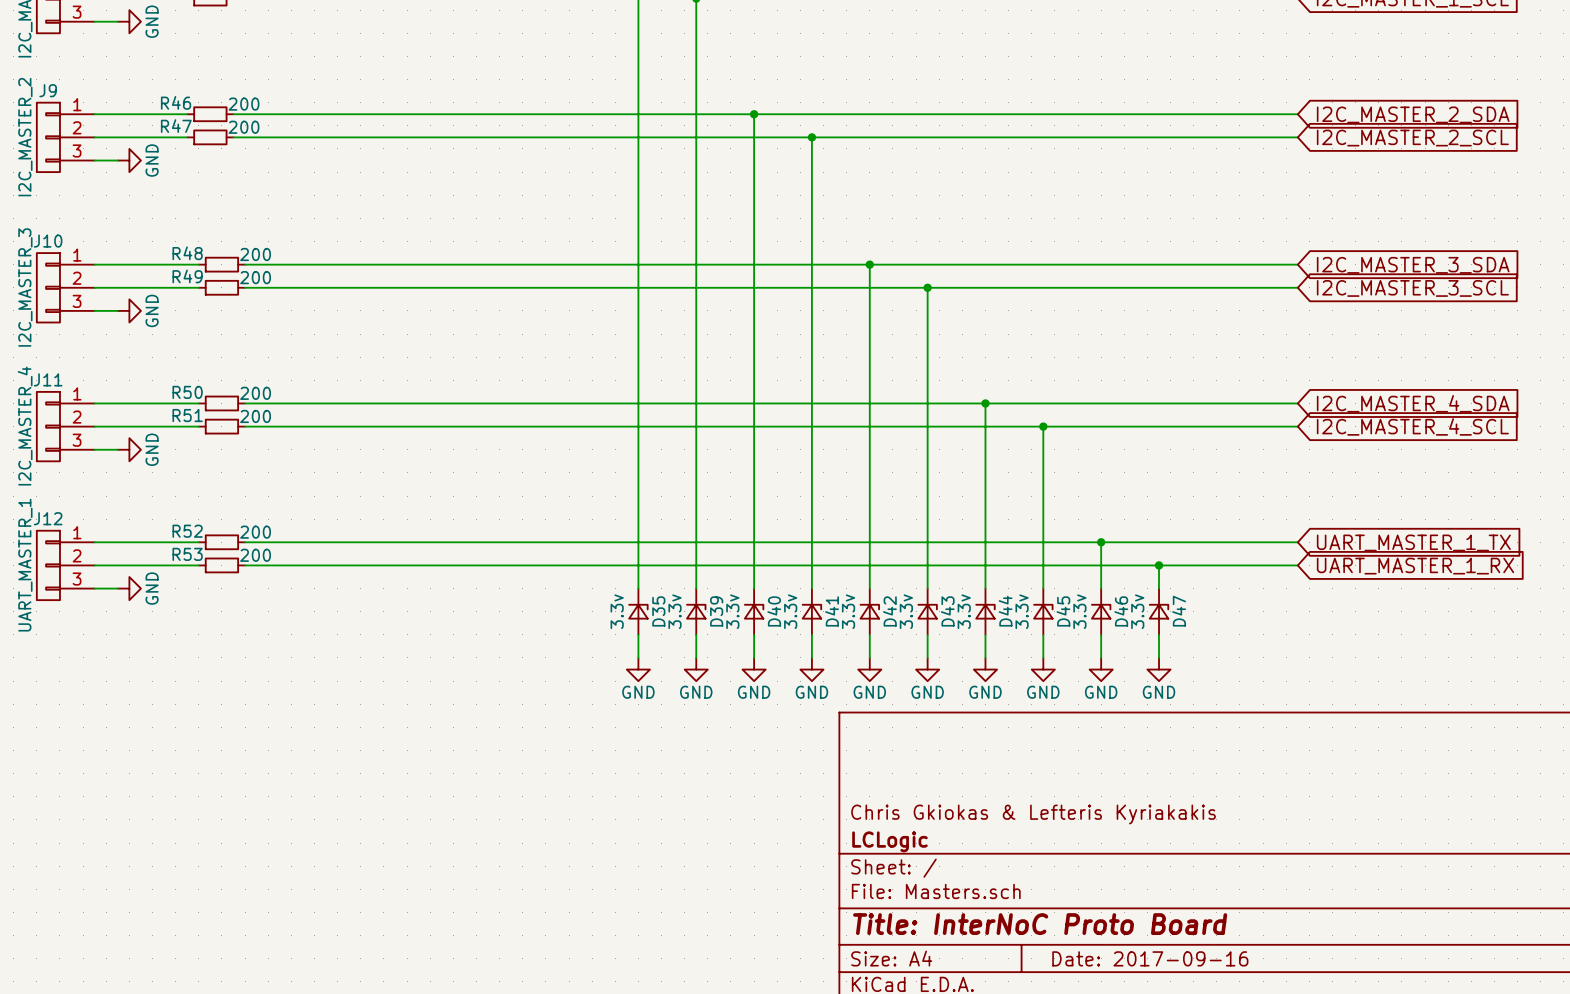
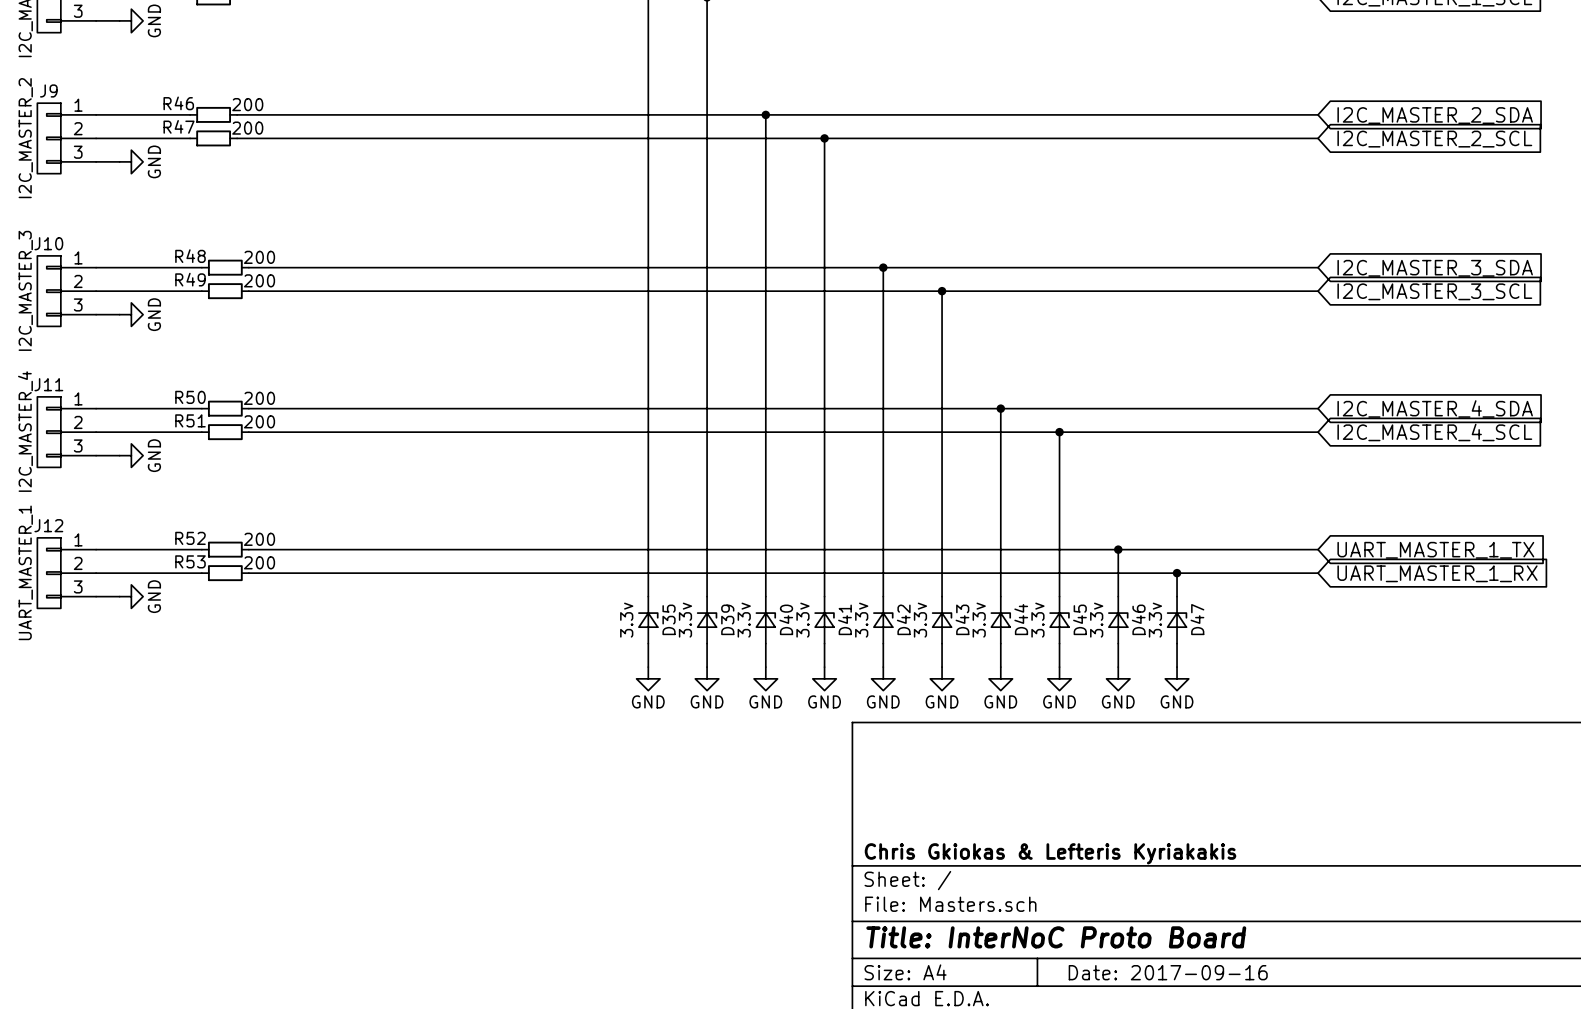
title block: Chris Gkiokas & Lefteris Kyriakakis (1033, 814) -> none
title block: LCLogic (889, 841) -> Chris Gkiokas & Lefteris Kyriakakis (1050, 853)

